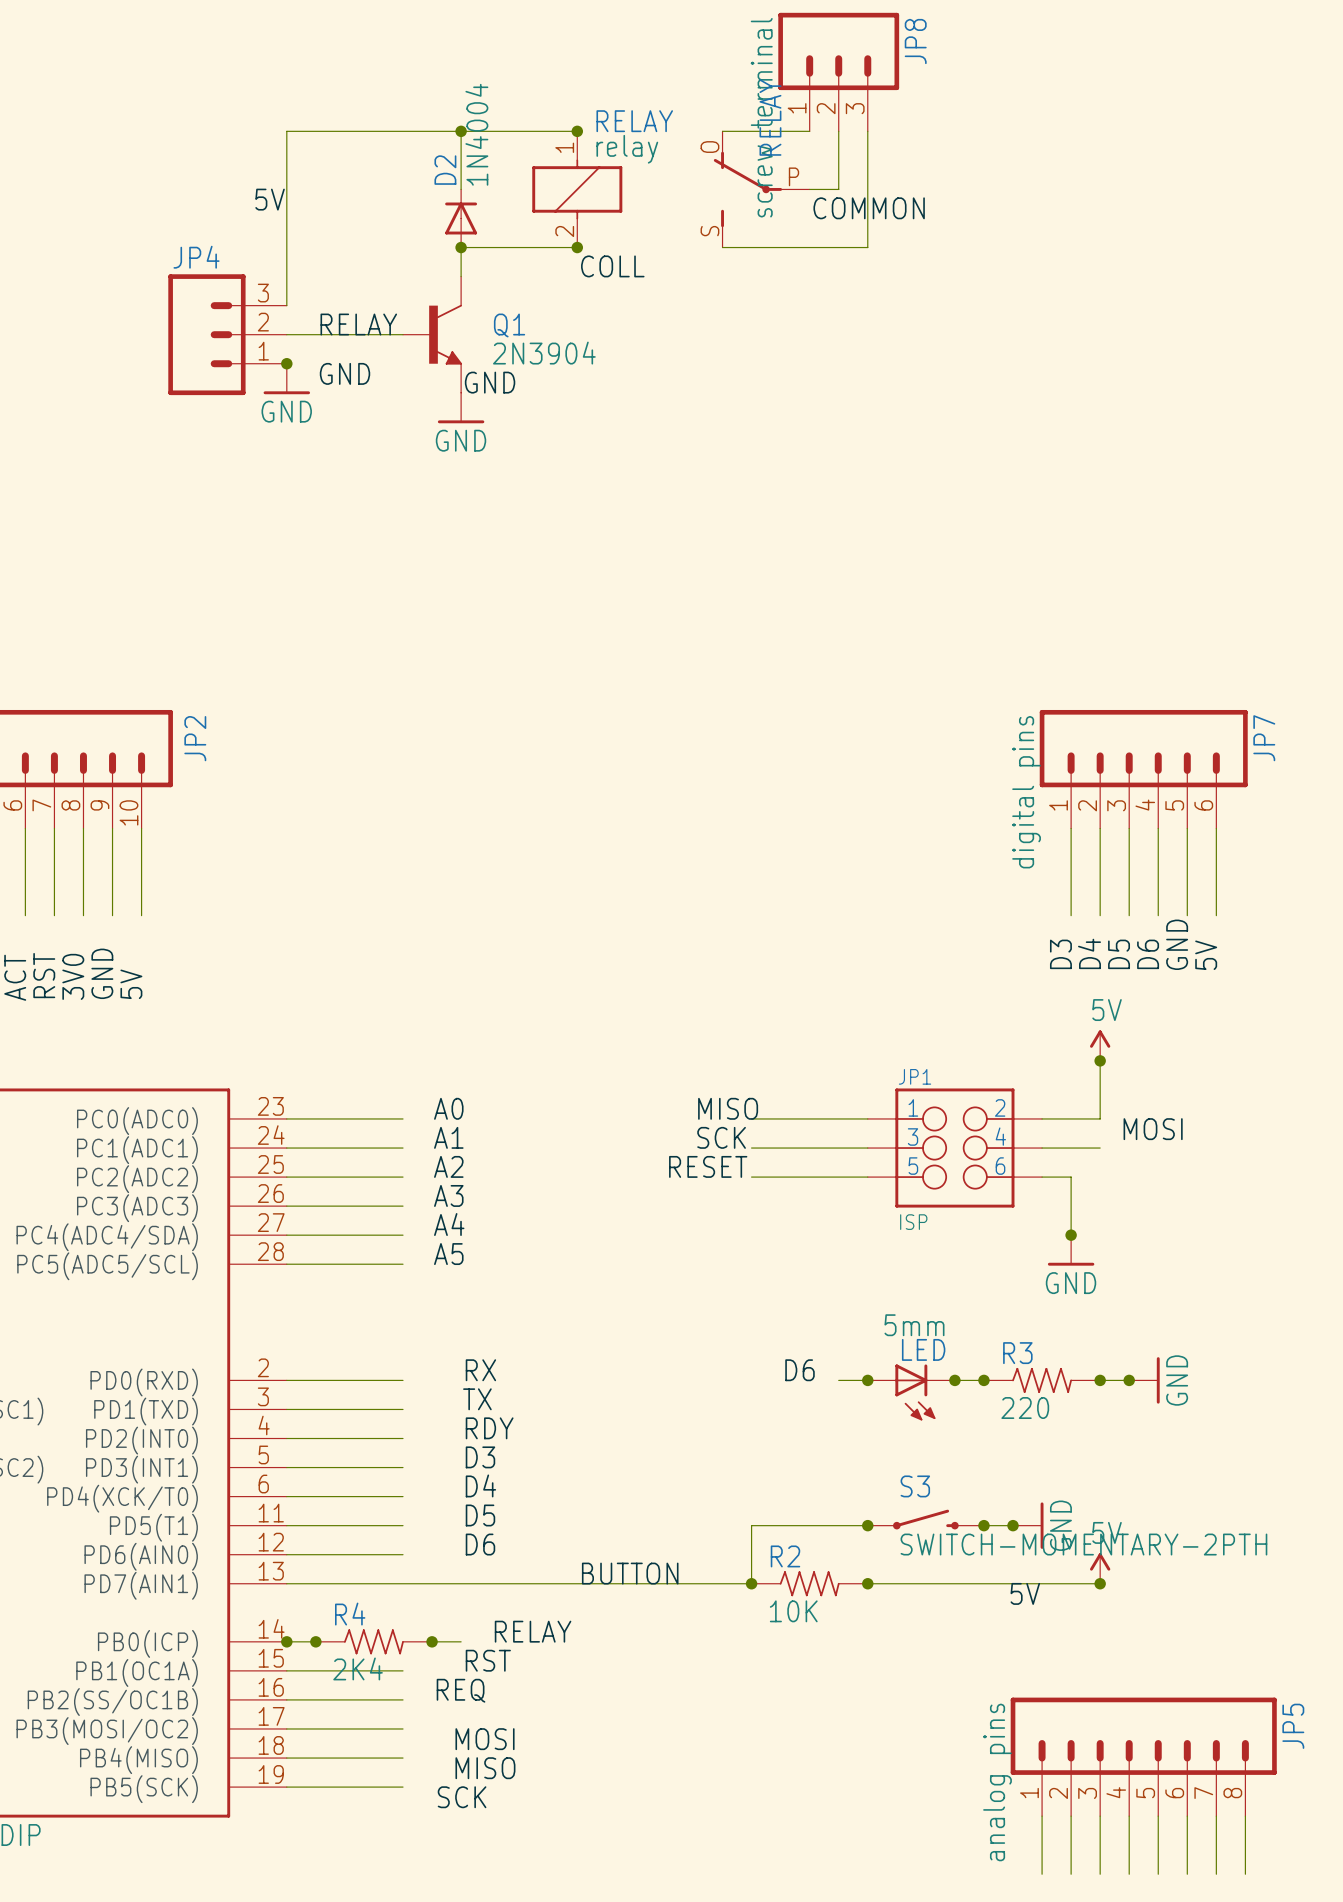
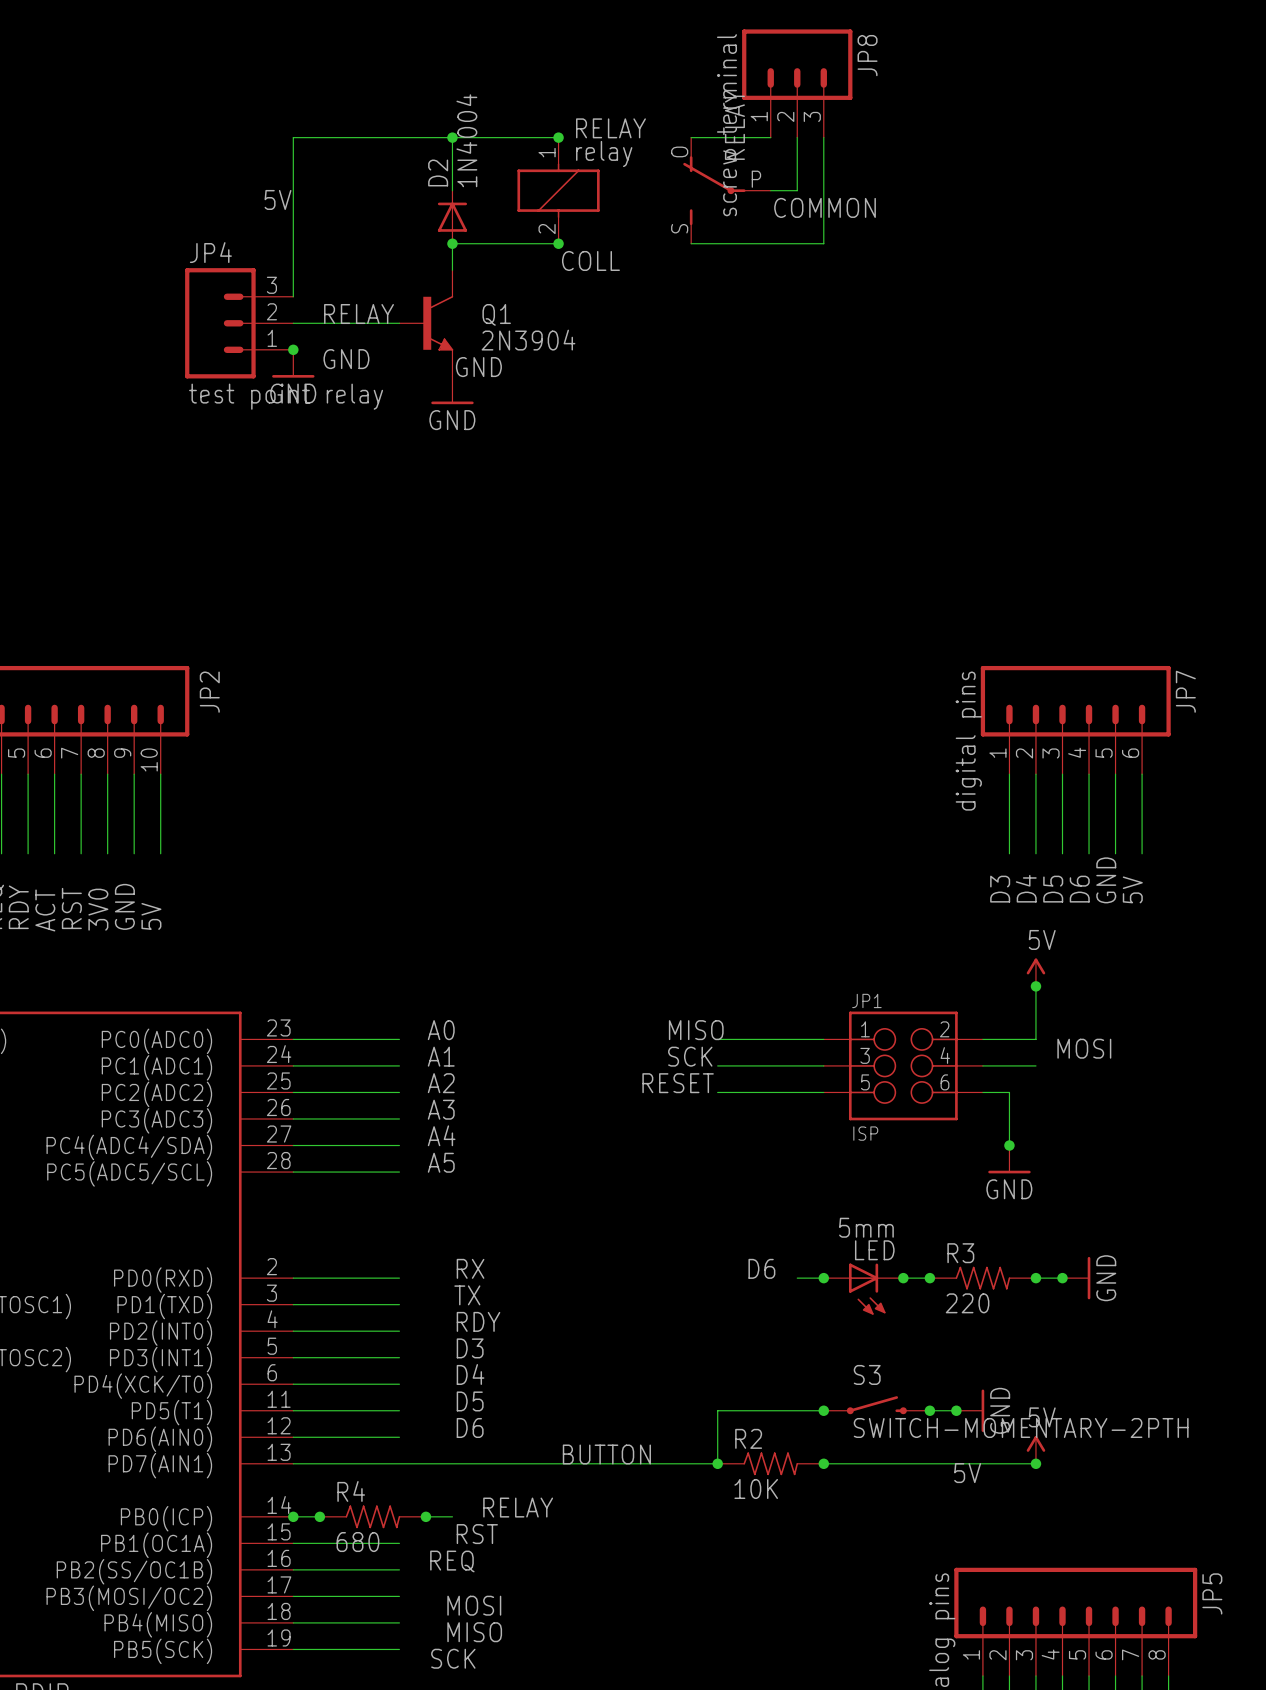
JP4 value: none -> test point relay (286, 396)
R4 value: 2K4 (358, 1668) -> 680 (357, 1542)

